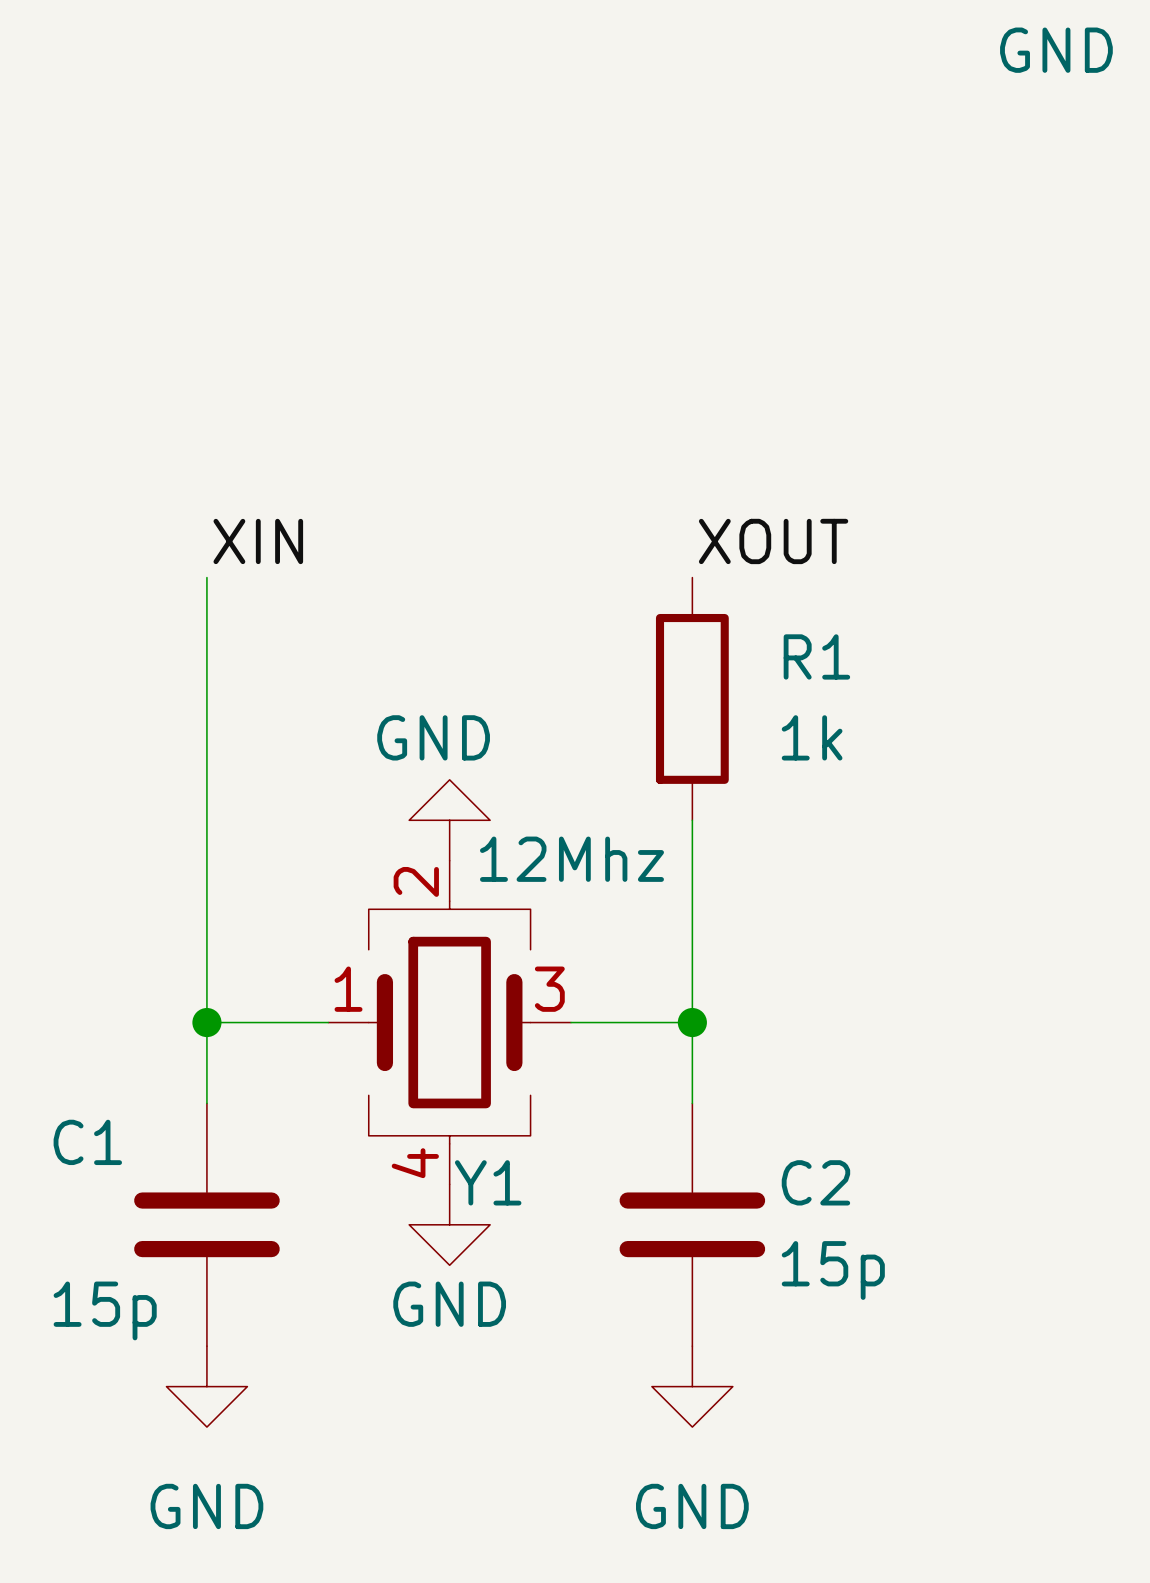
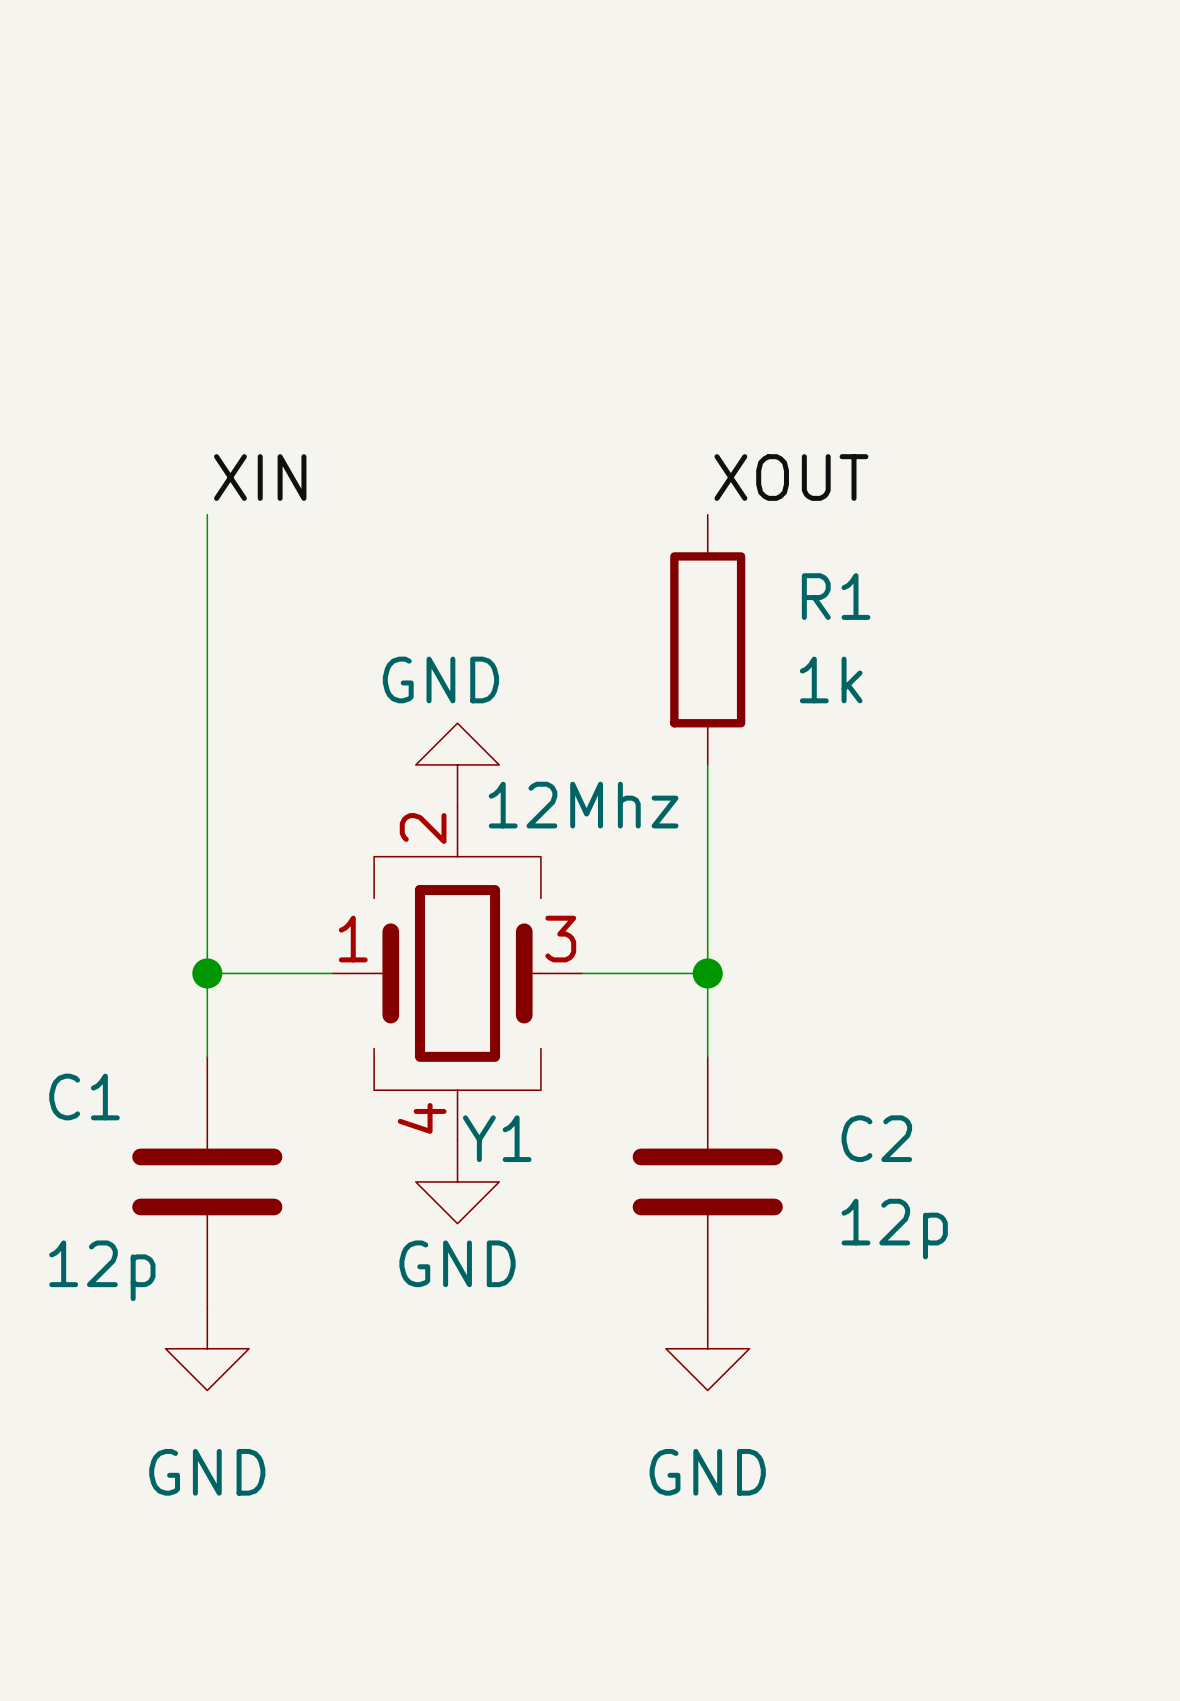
C2 name position: C2 (815, 1182) -> C2 (876, 1138)
C2 value: 15p (833, 1270) -> 12p (894, 1229)
C1 value: 15p (105, 1310) -> 12p (102, 1270)

